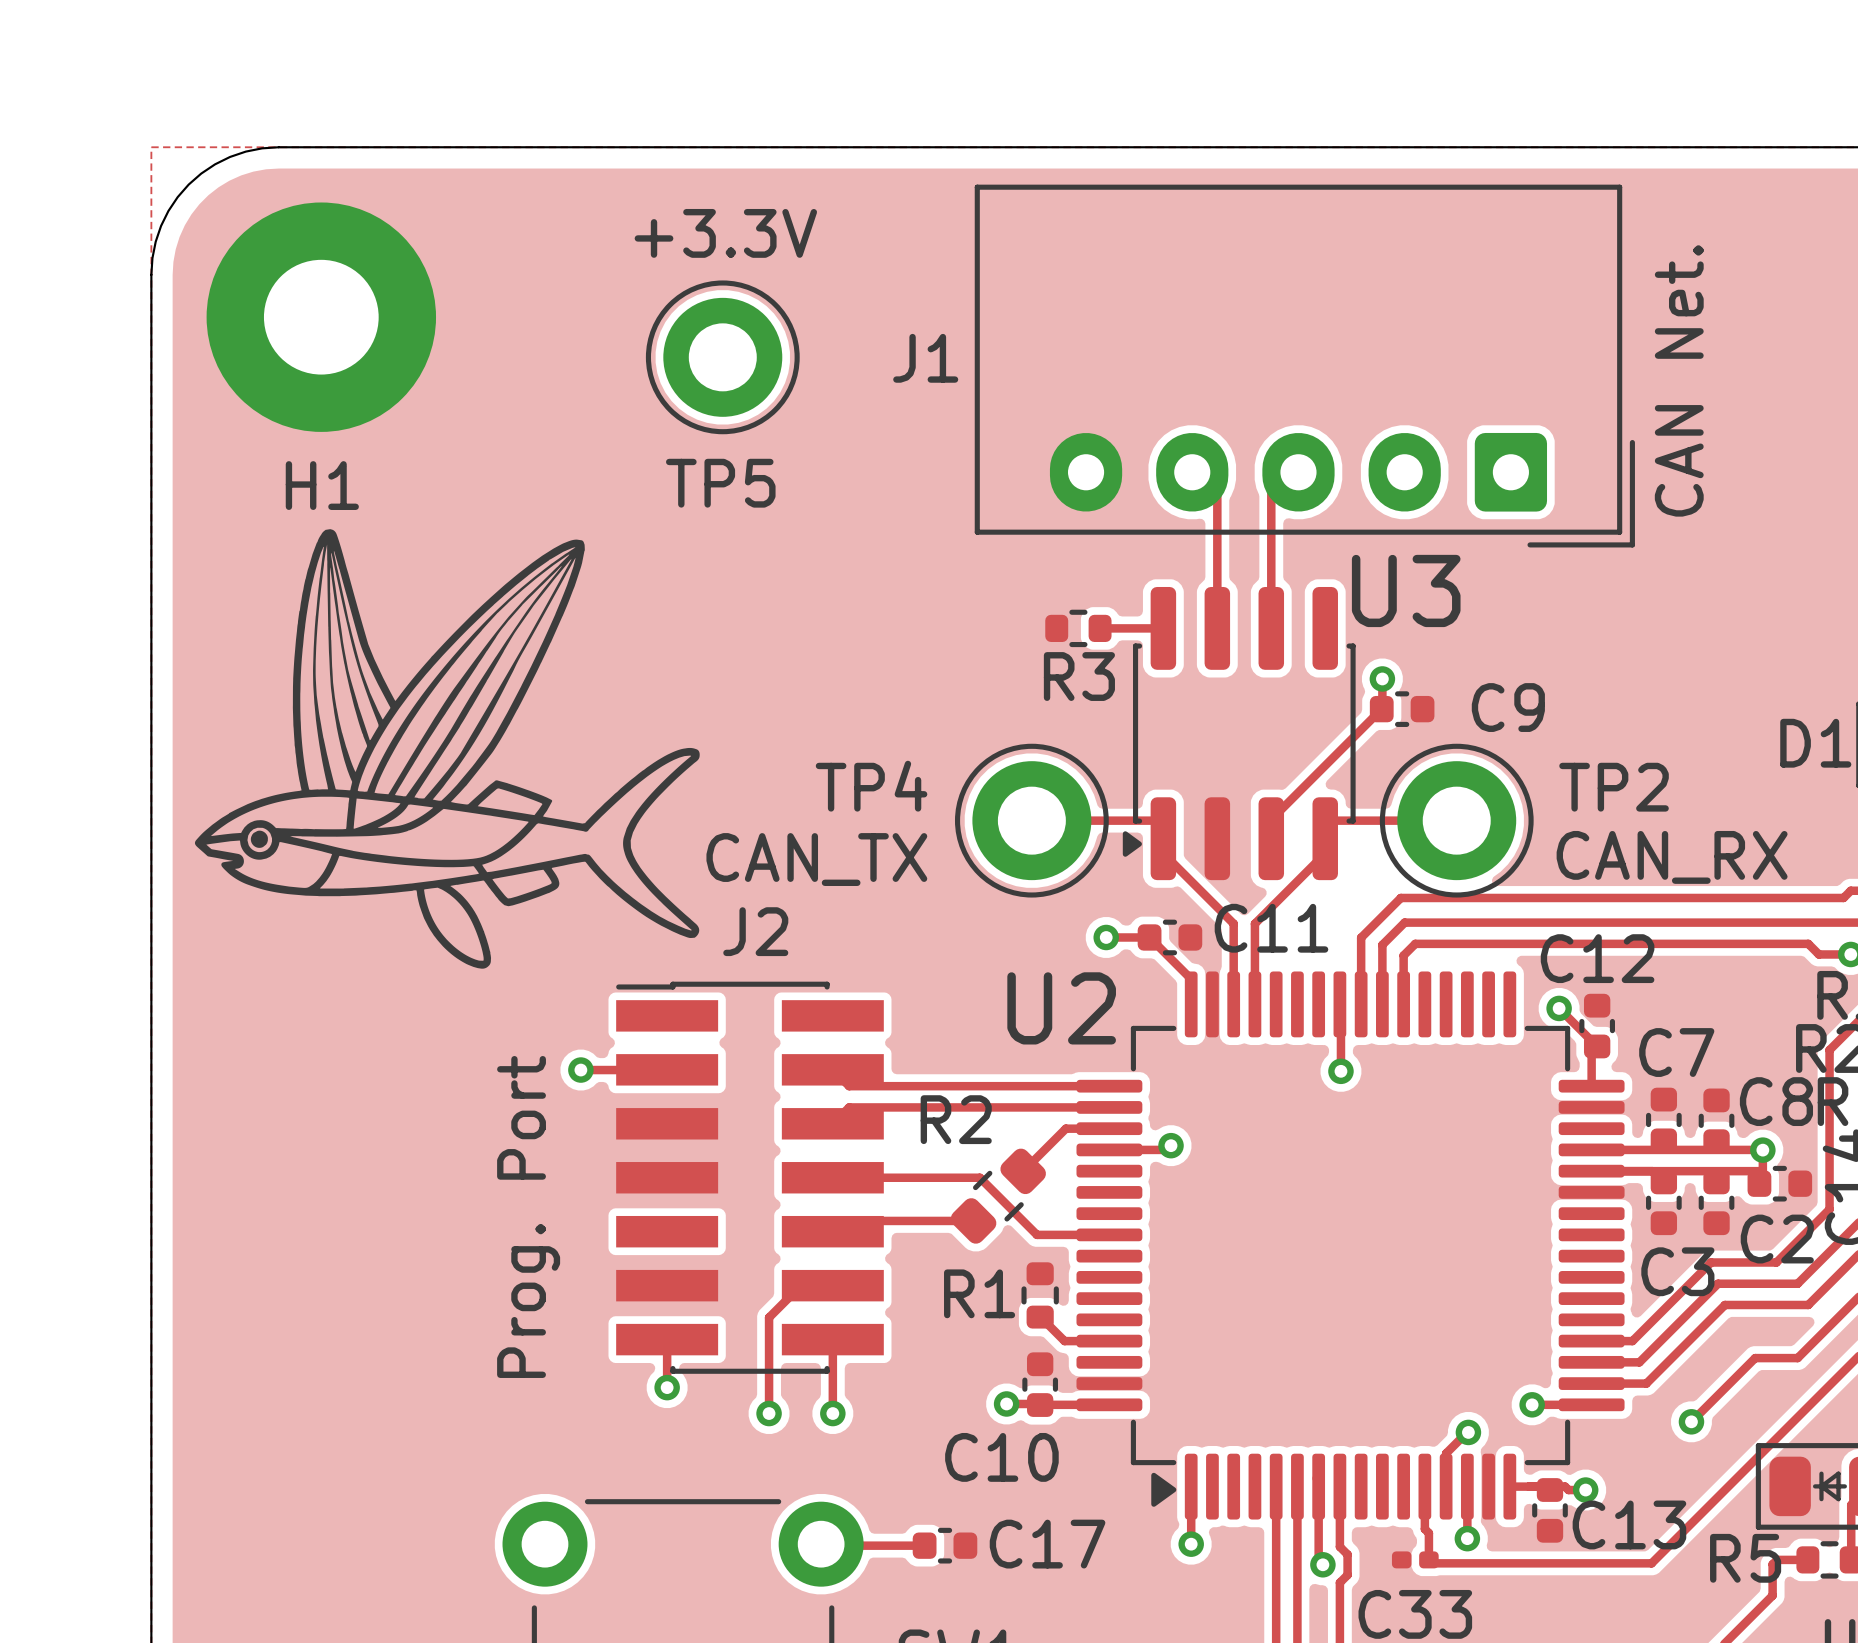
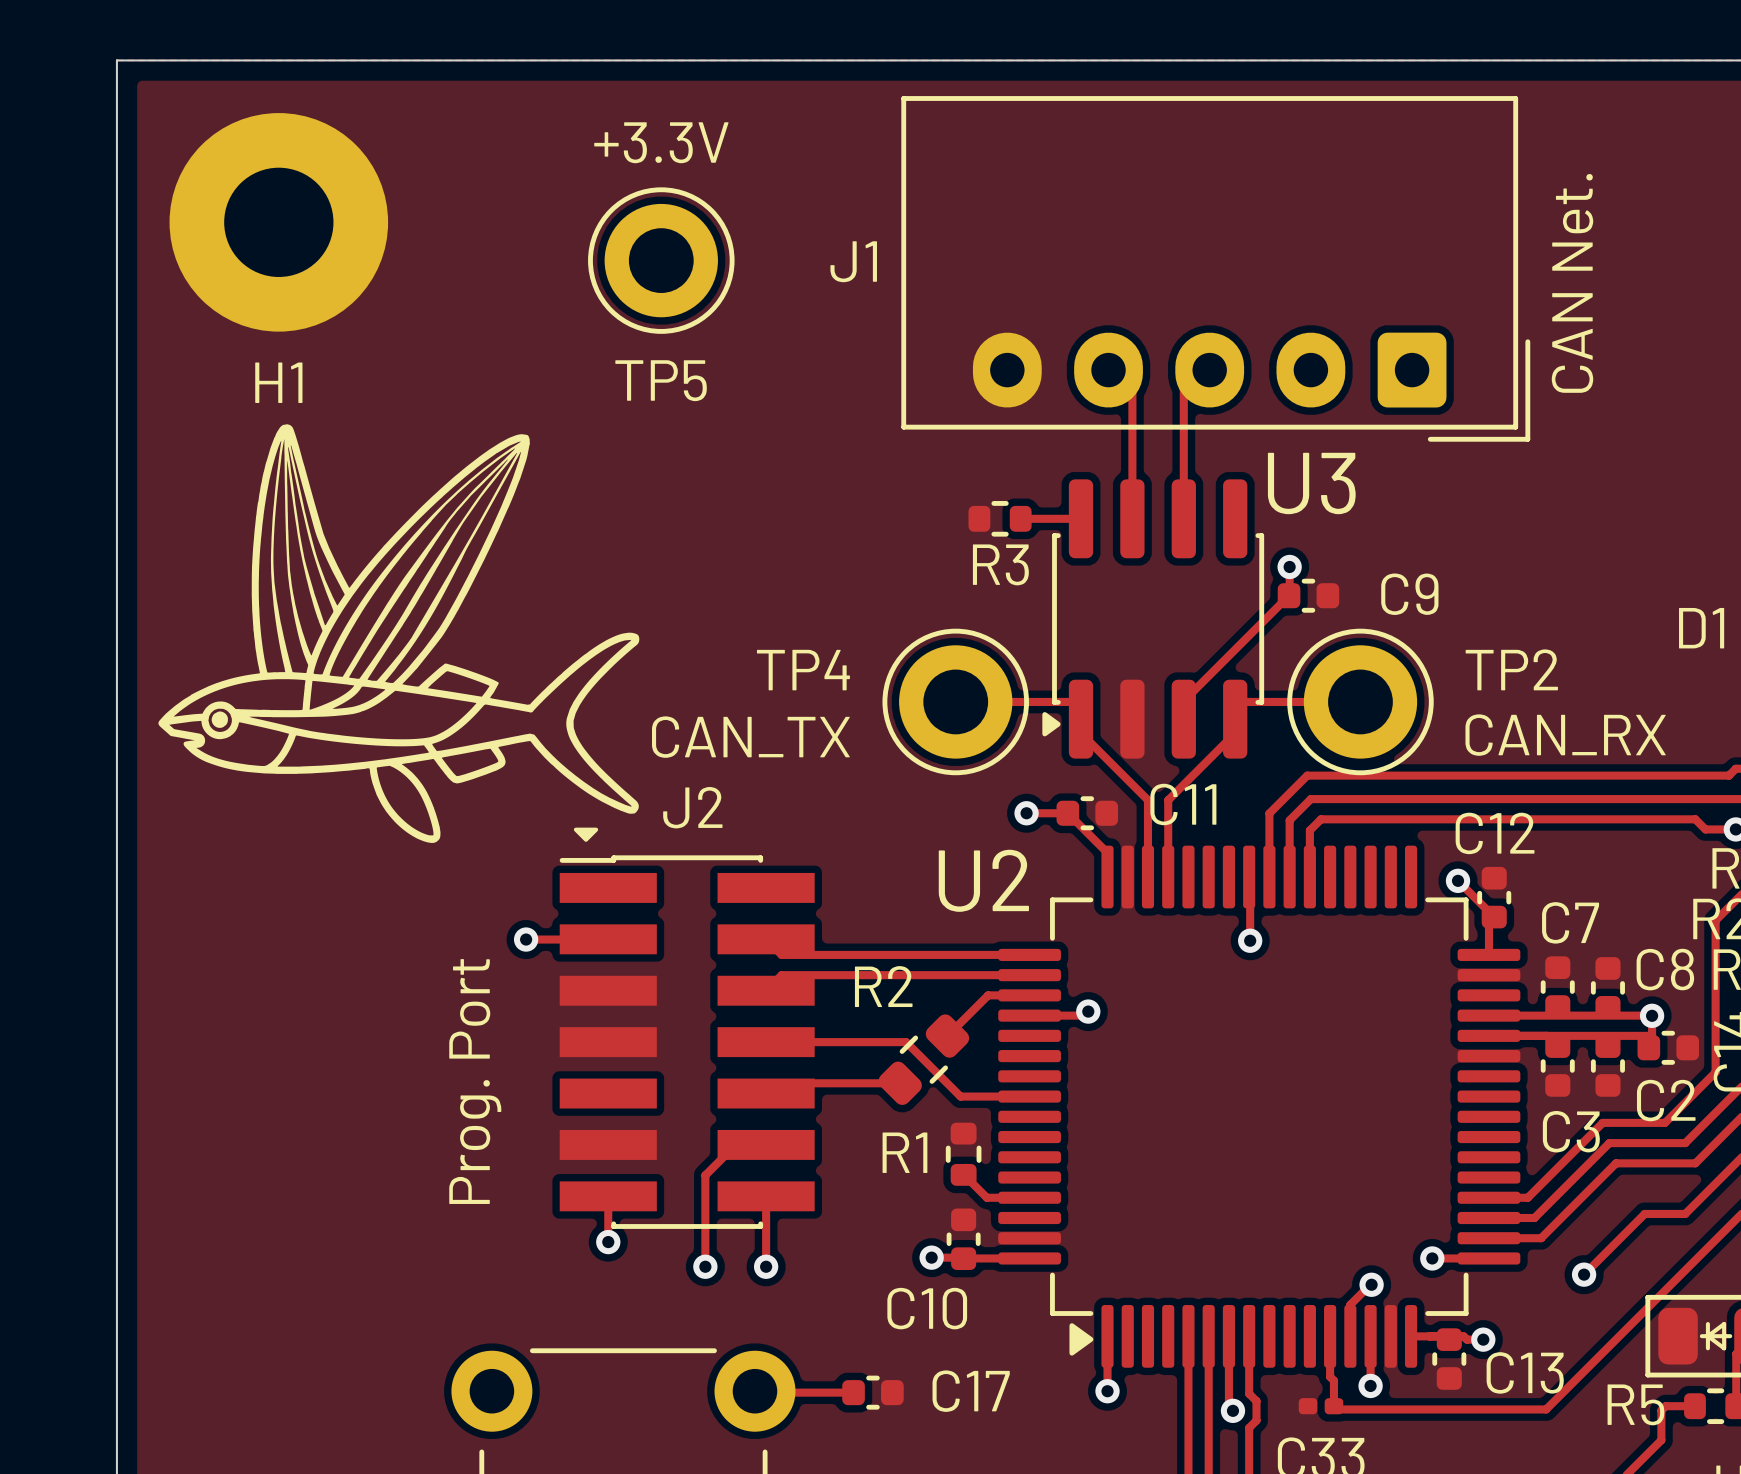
board edge: (278, 147) (245, 151) (230, 156) (201, 173) (188, 184) (177, 197) (161, 225) (152, 258) (151, 274) -> (238, 60) (116, 60) (116, 181)
J2 footprint: [616, 981, 884, 1374] -> [559, 827, 815, 1229]

